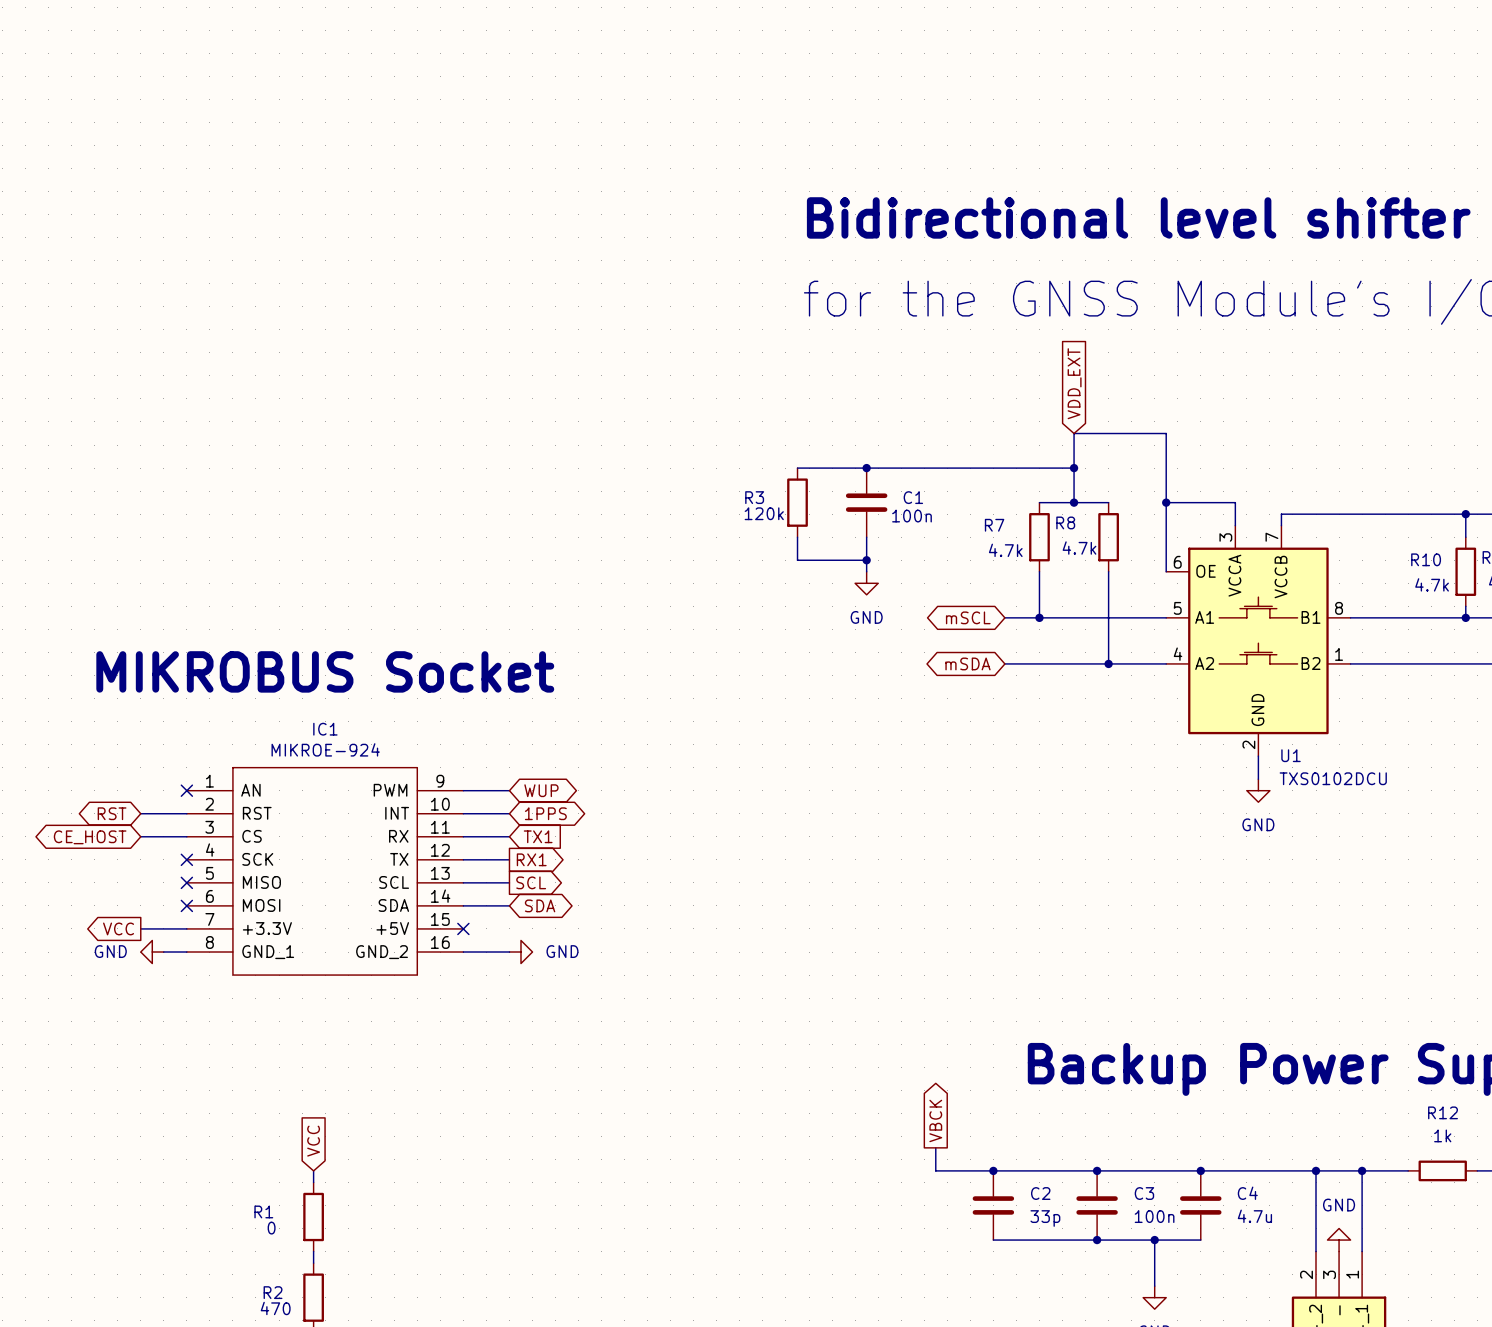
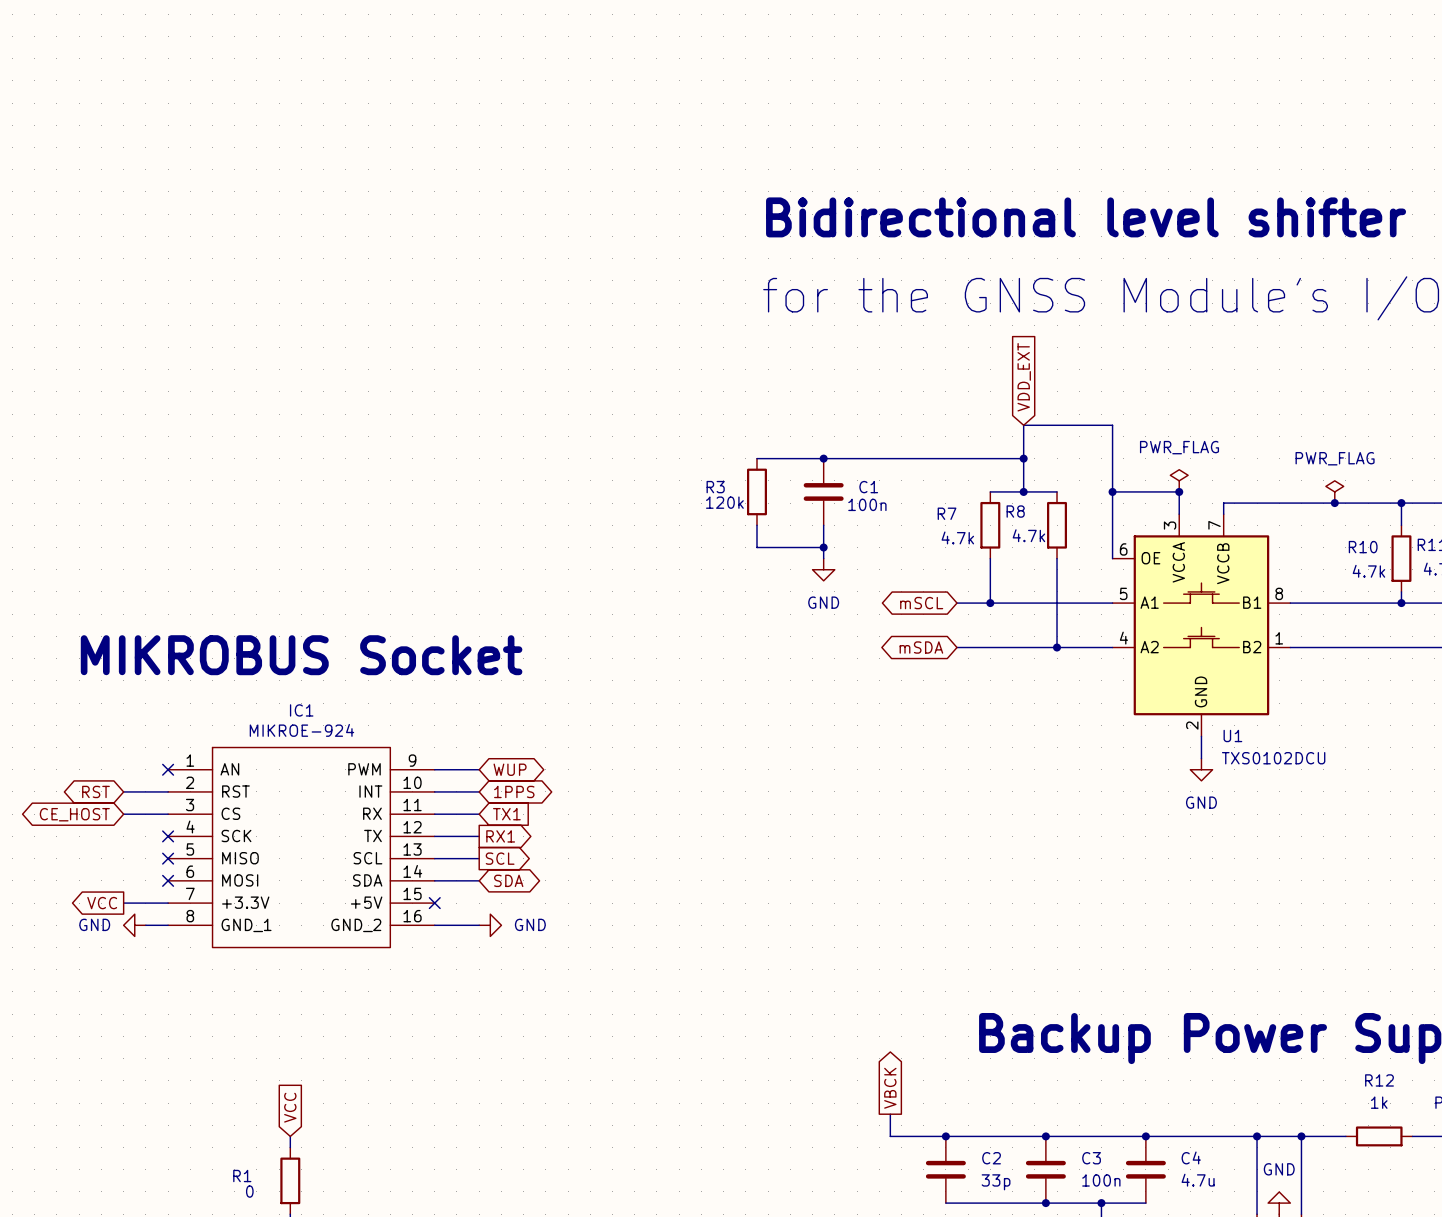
power symbol: none -> PWR_FLAG (1179, 480)
junction: none -> (1179, 491)
power symbol: none -> PWR_FLAG (1334, 491)
junction: none -> (1334, 503)

